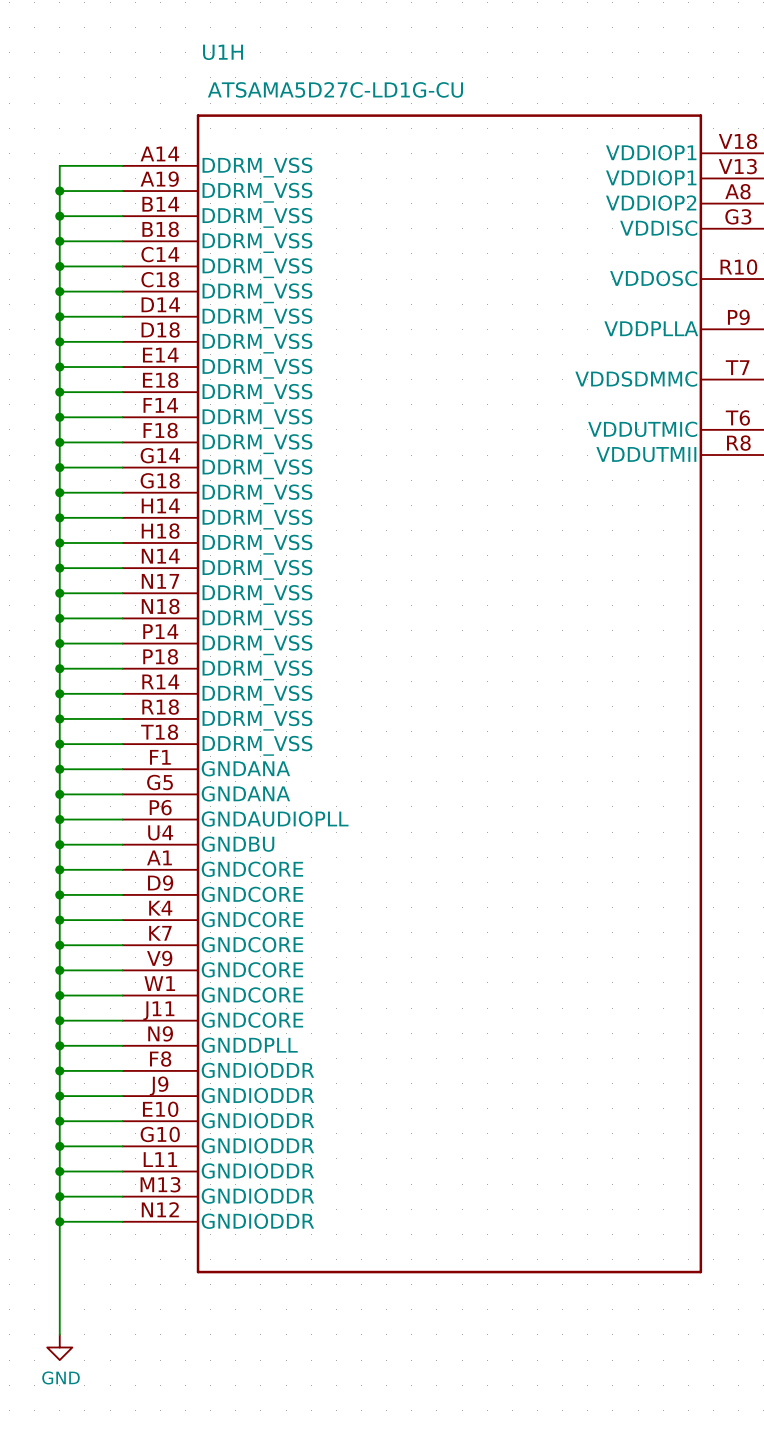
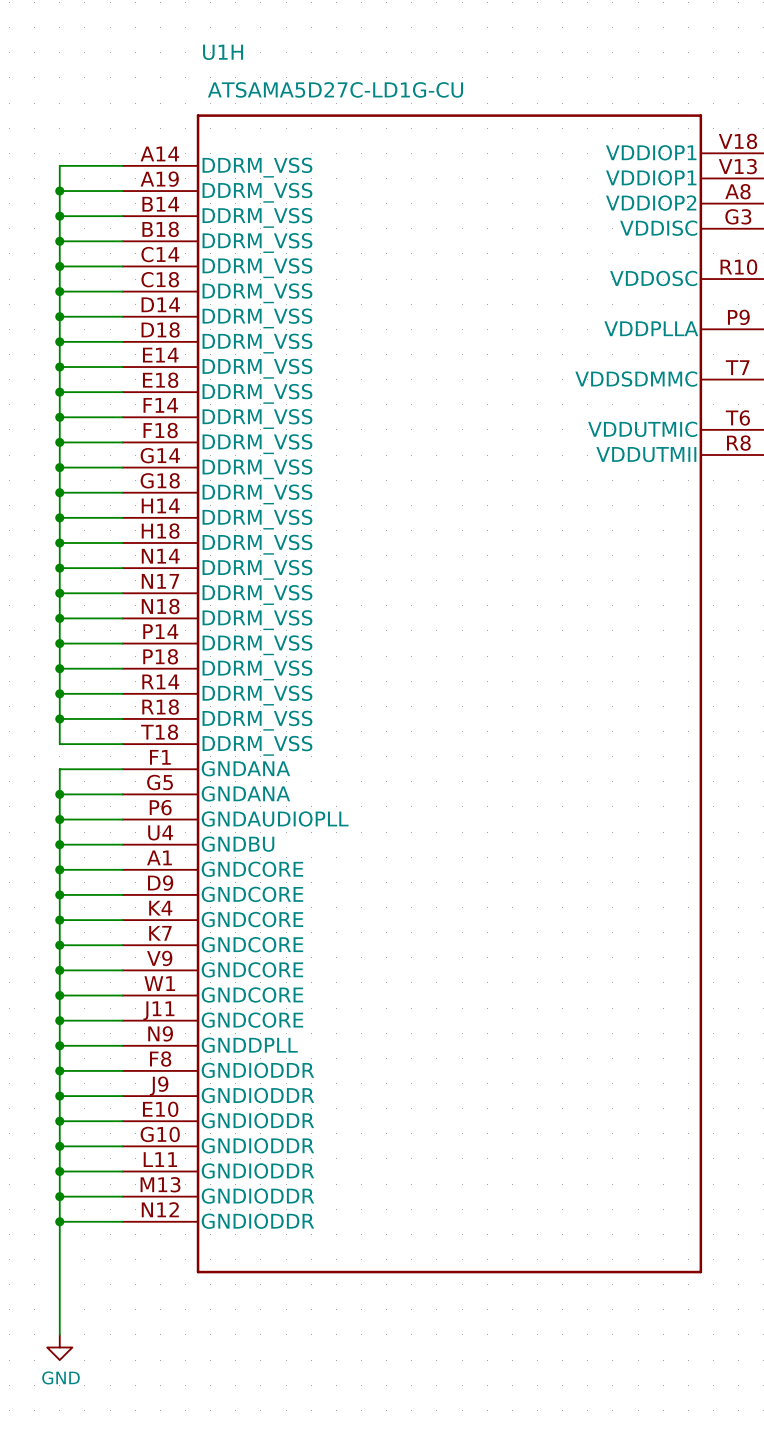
wire: (59, 744) (59, 769) -> none
junction: (59, 744) -> none
junction: (59, 769) -> none

